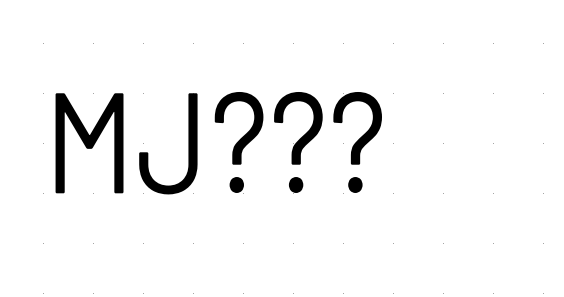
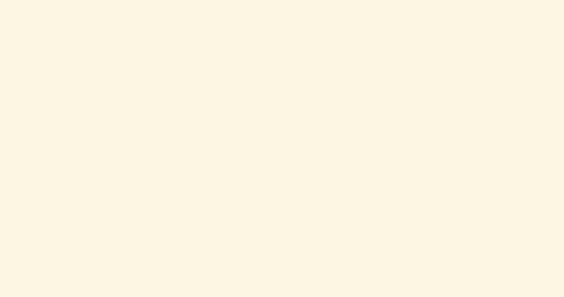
text: MJ??? (218, 143) -> none

